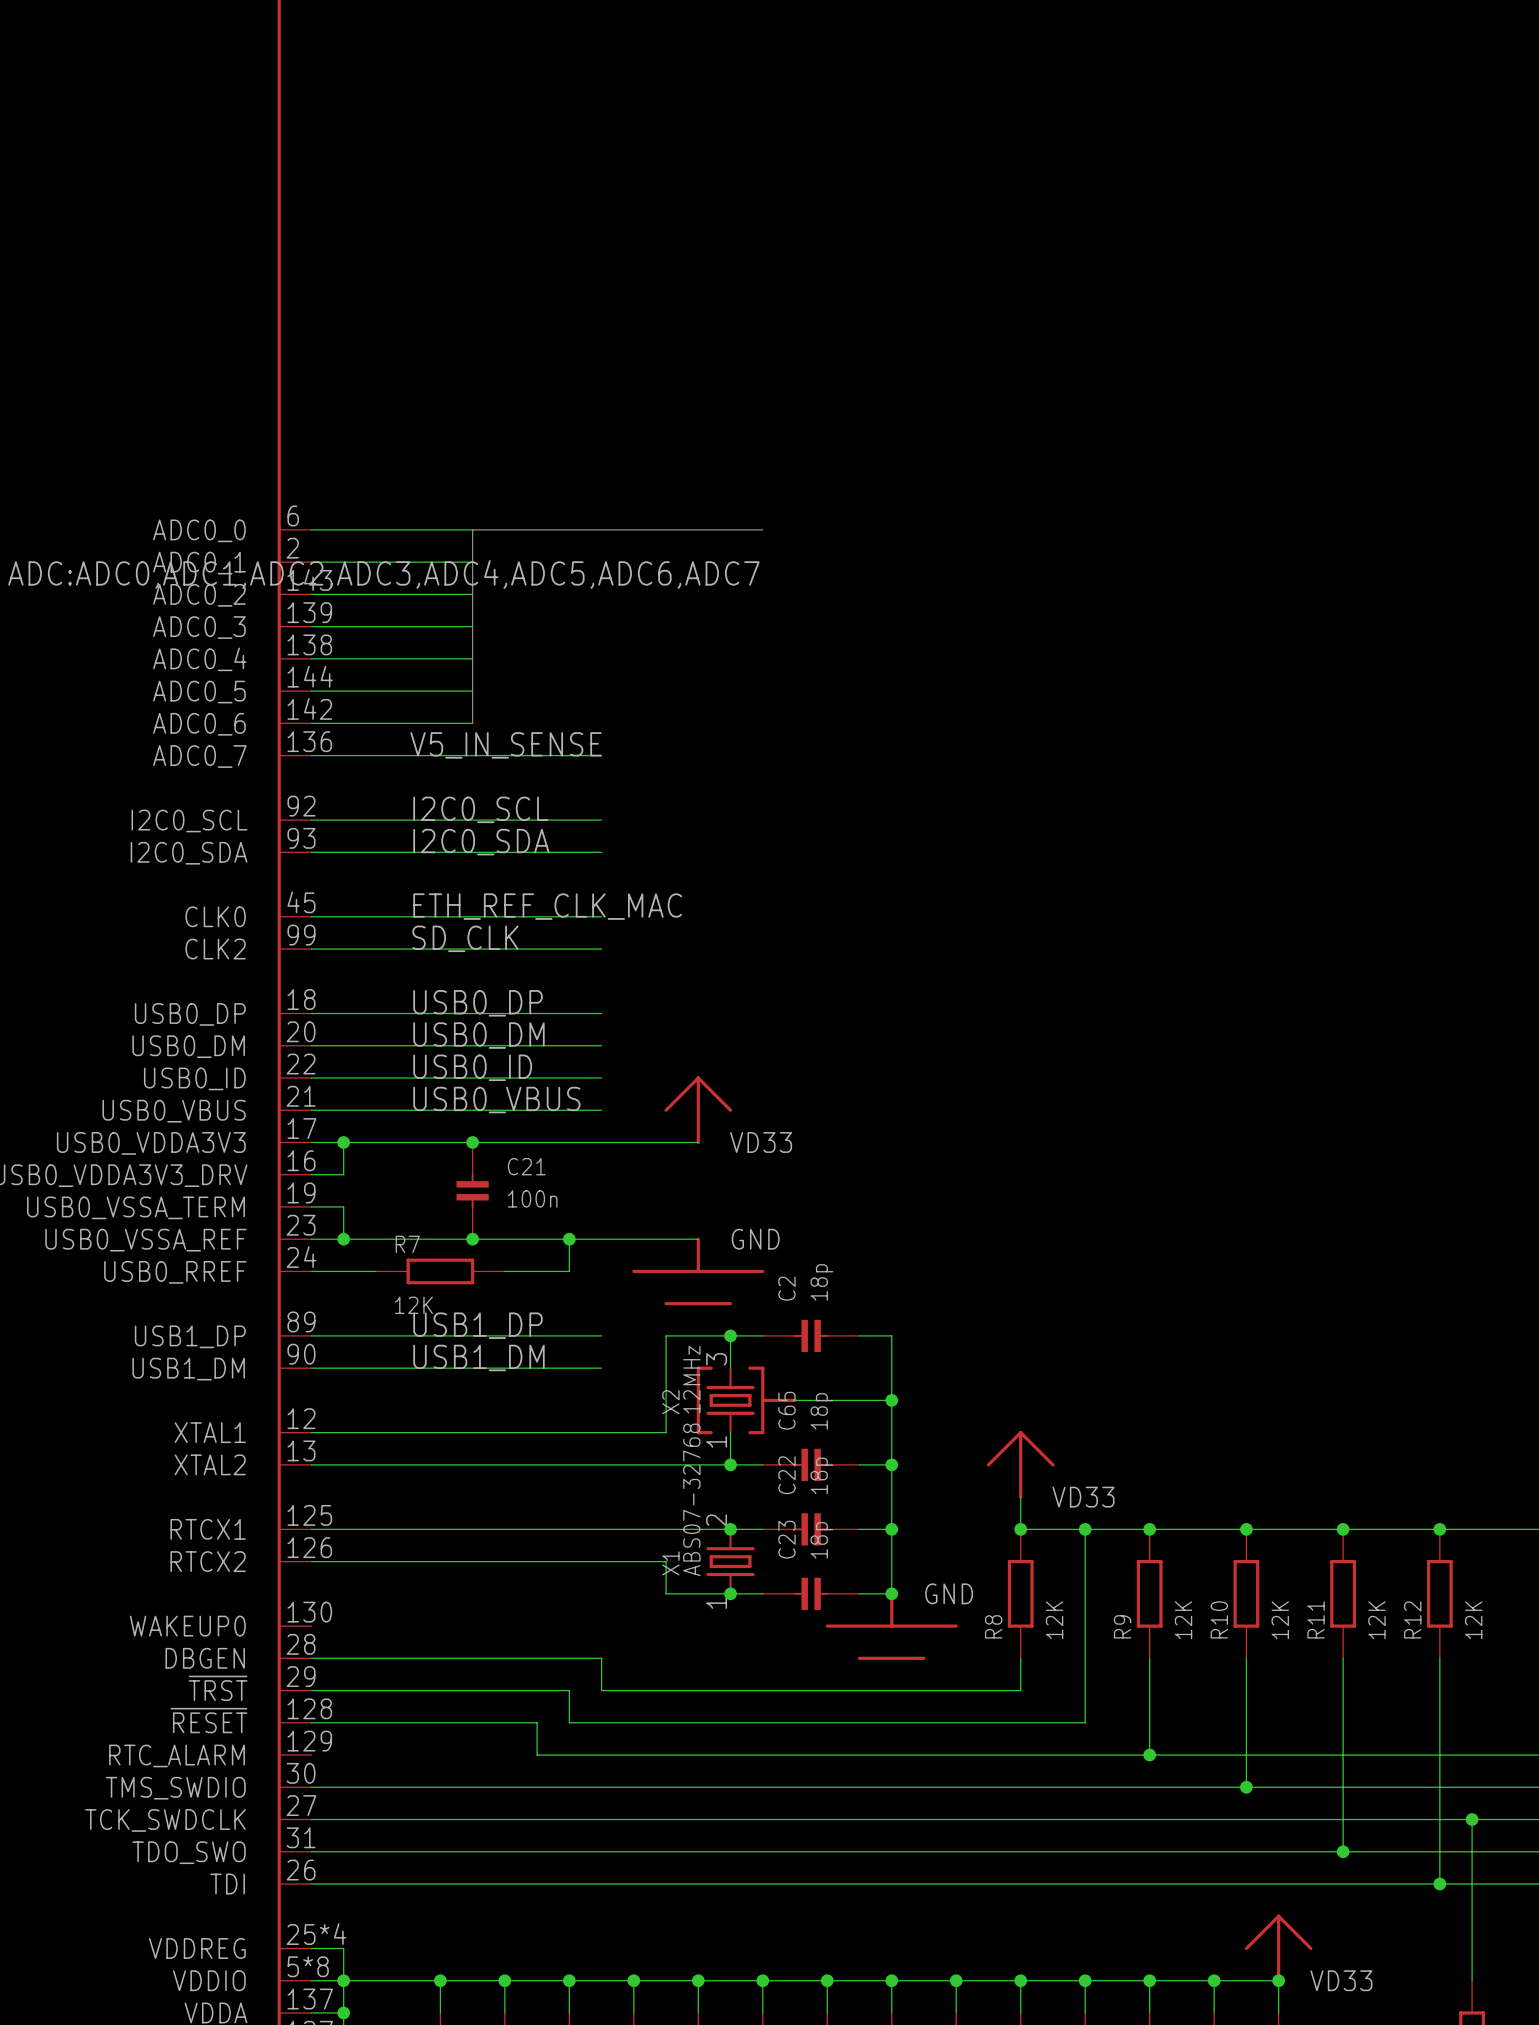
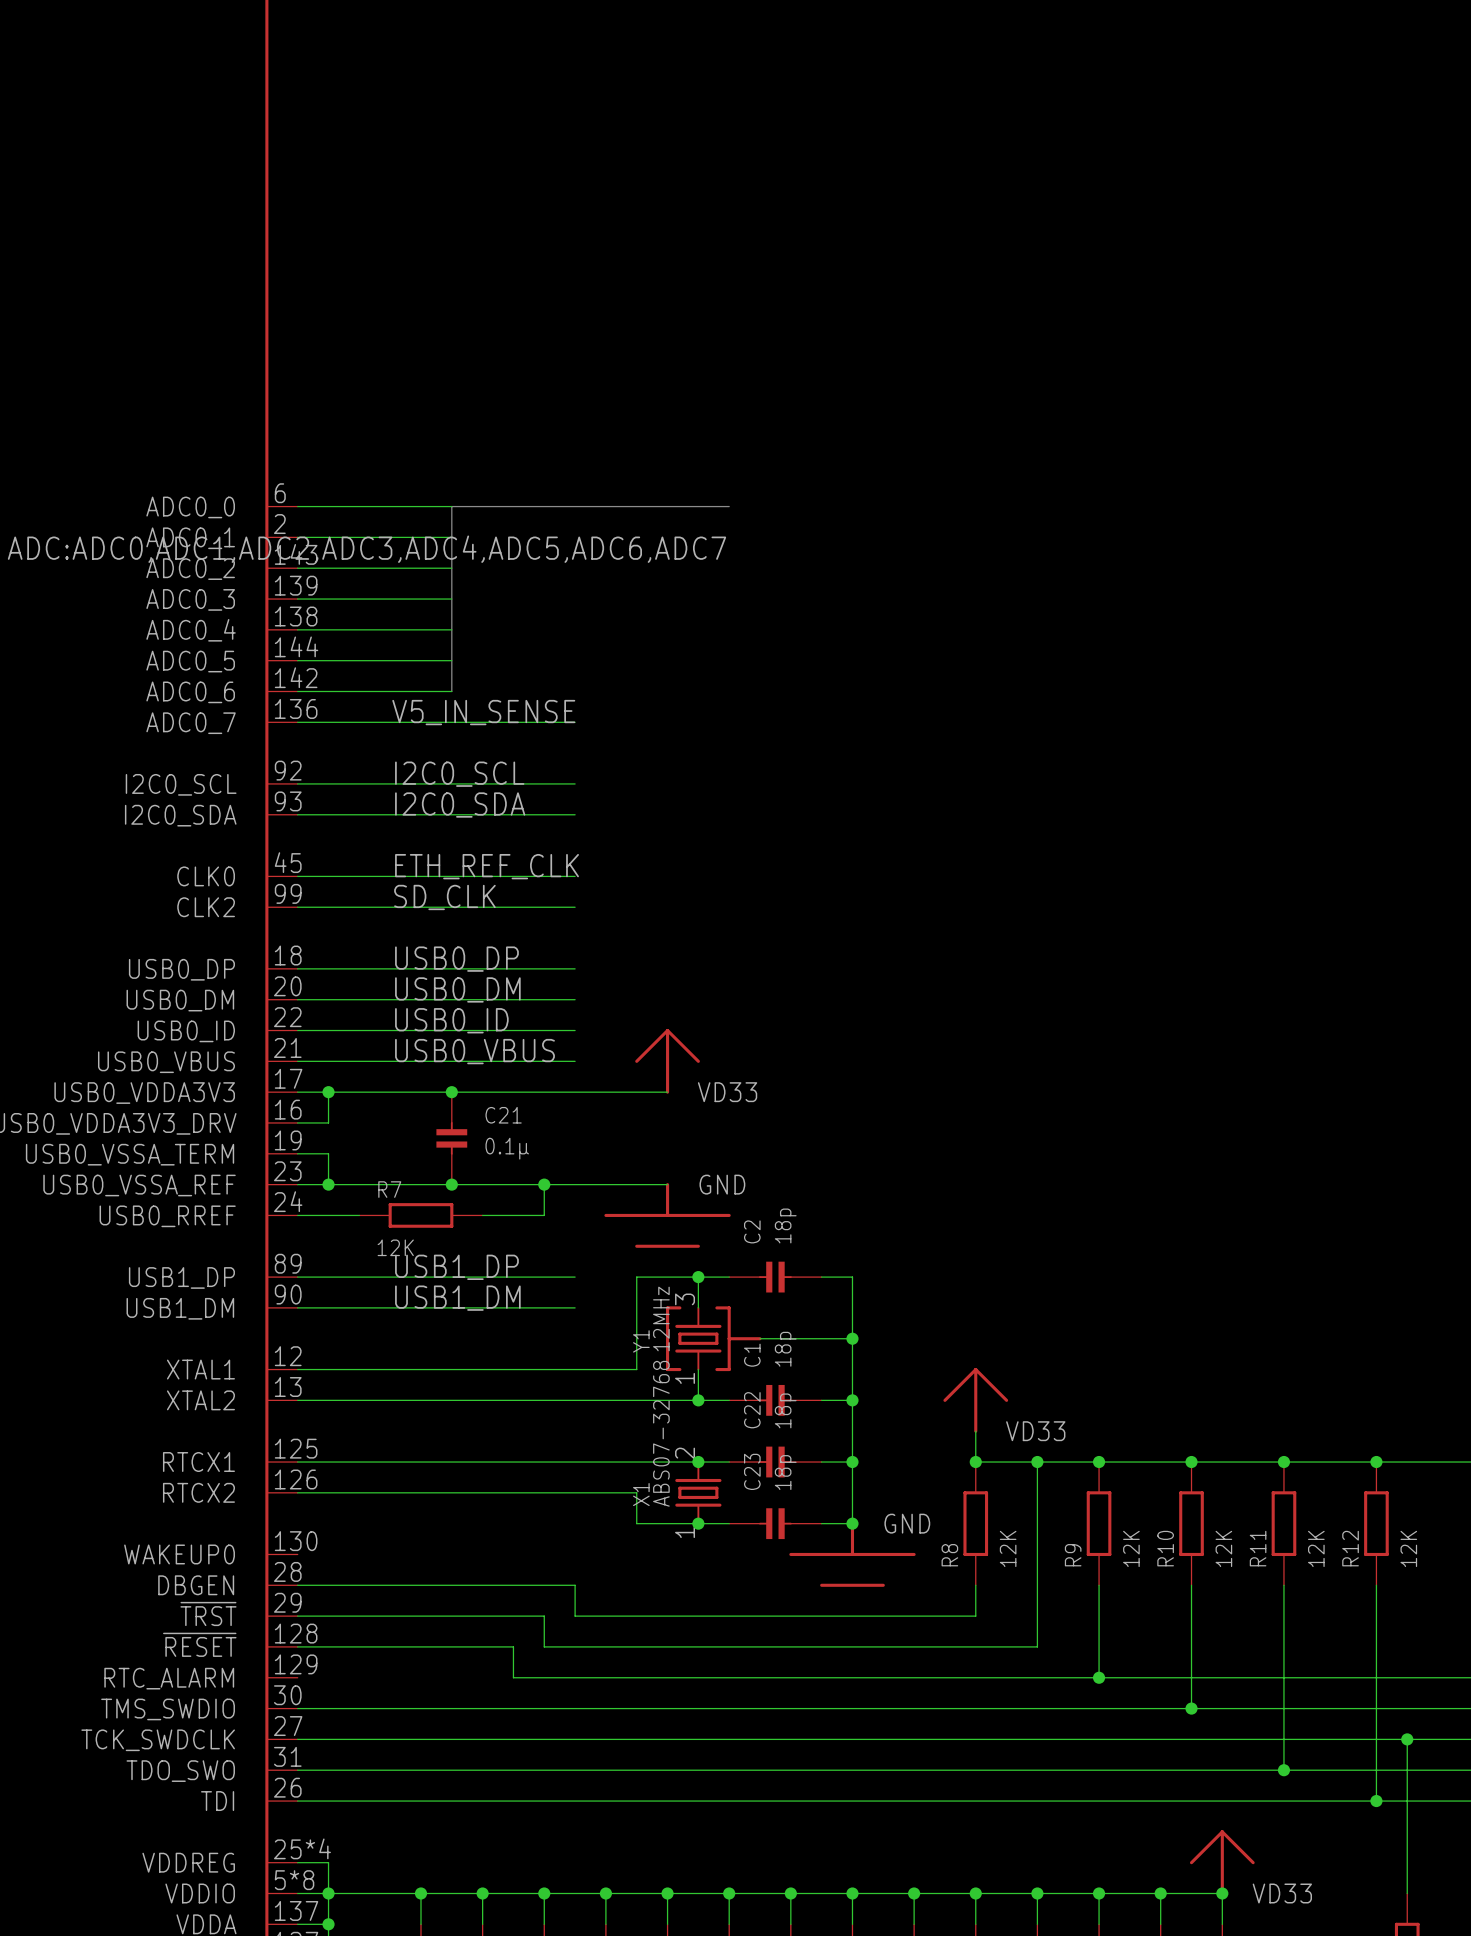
label: ETH_REF_CLK_MAC (547, 906) -> ETH_REF_CLK (487, 866)
C21 value: 100n (532, 1198) -> 0.1µ (507, 1148)
X2 name: X2 (670, 1402) -> Y1 (641, 1341)
C65 name: C65 (786, 1410) -> C1 (752, 1355)

